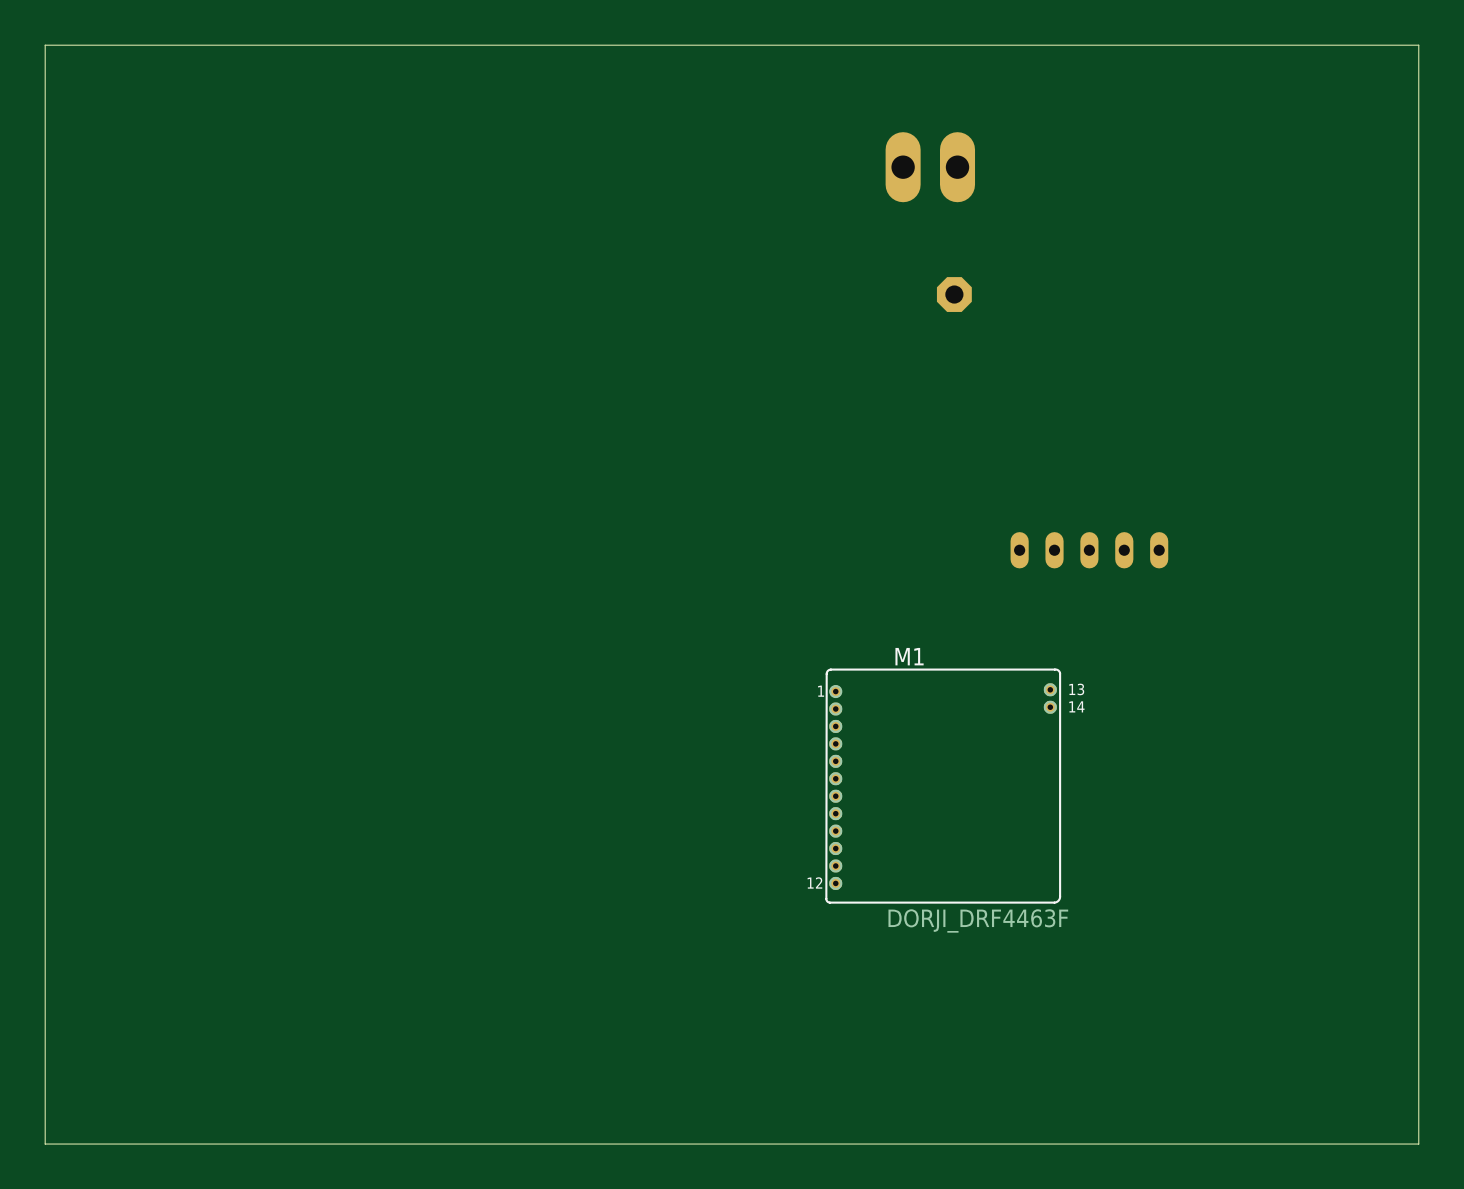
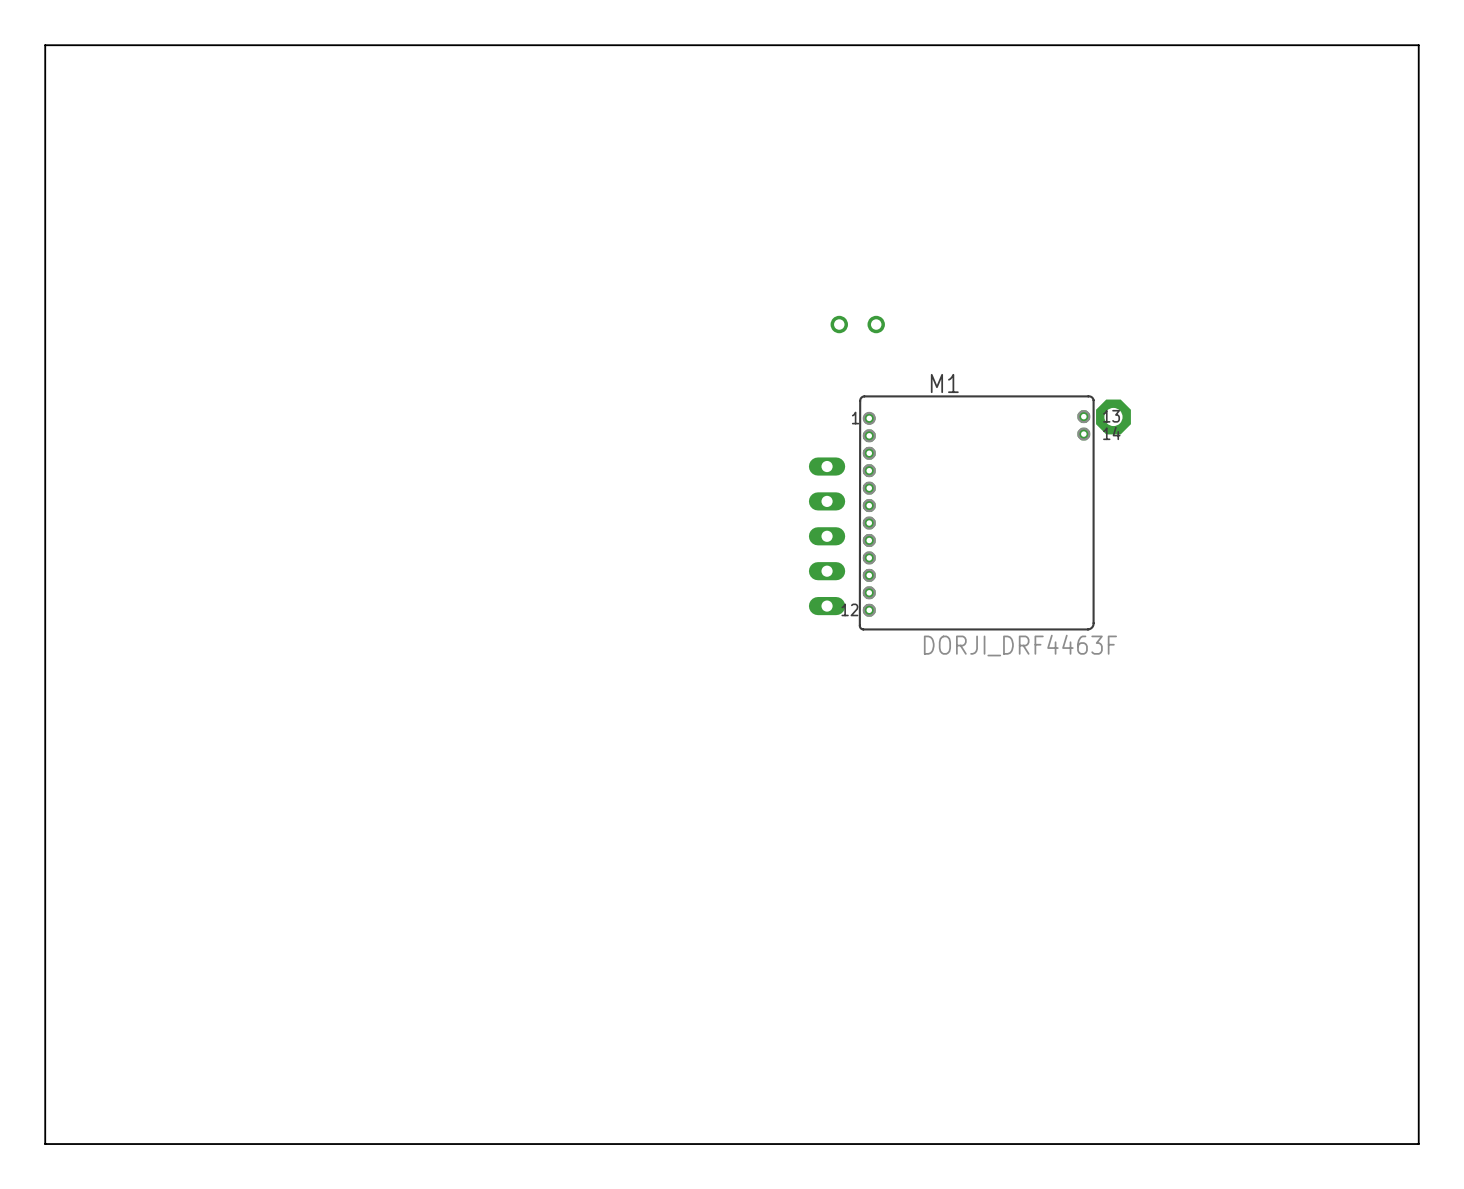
part: (930, 167) -> none
part position: (954, 294) -> (1113, 416)
part: none -> (857, 324)
part rotation: 0° (1089, 550) -> 90° clockwise (827, 536)
part position: (1089, 550) -> (827, 536)
M1 position: (943, 786) -> (976, 512)

